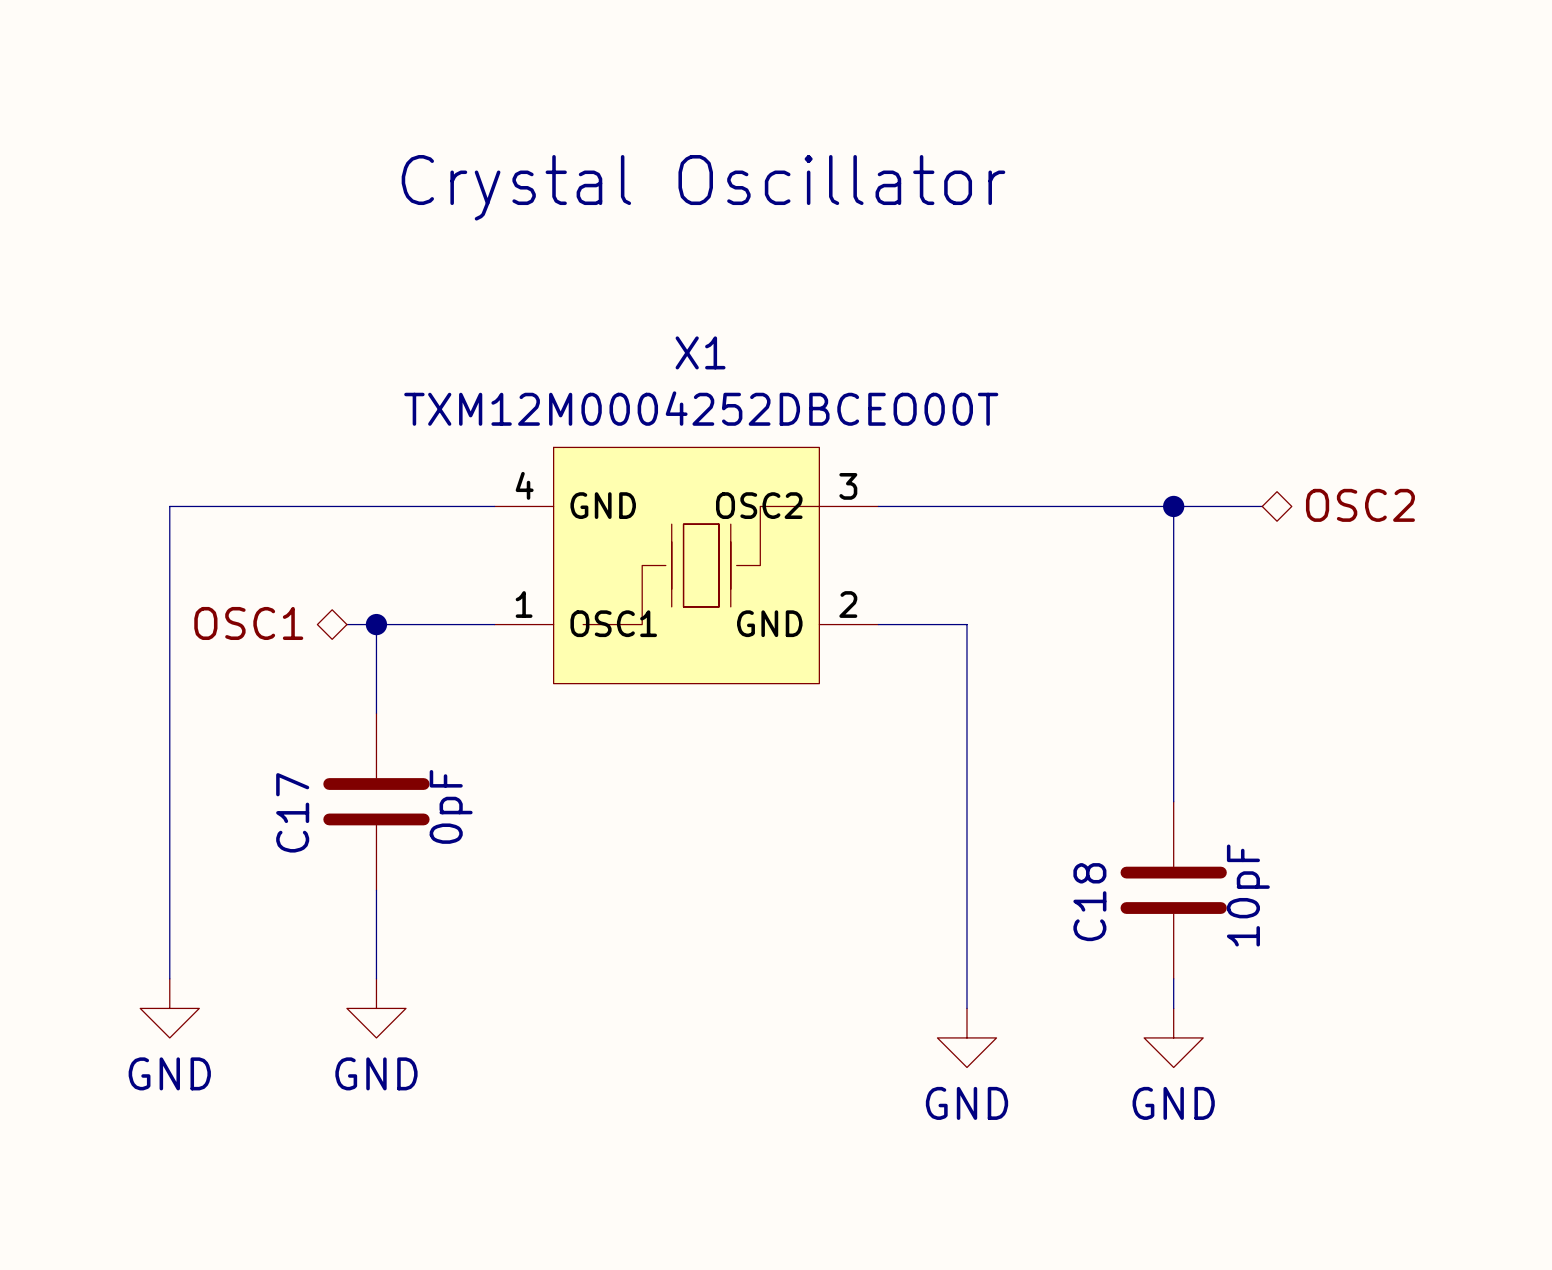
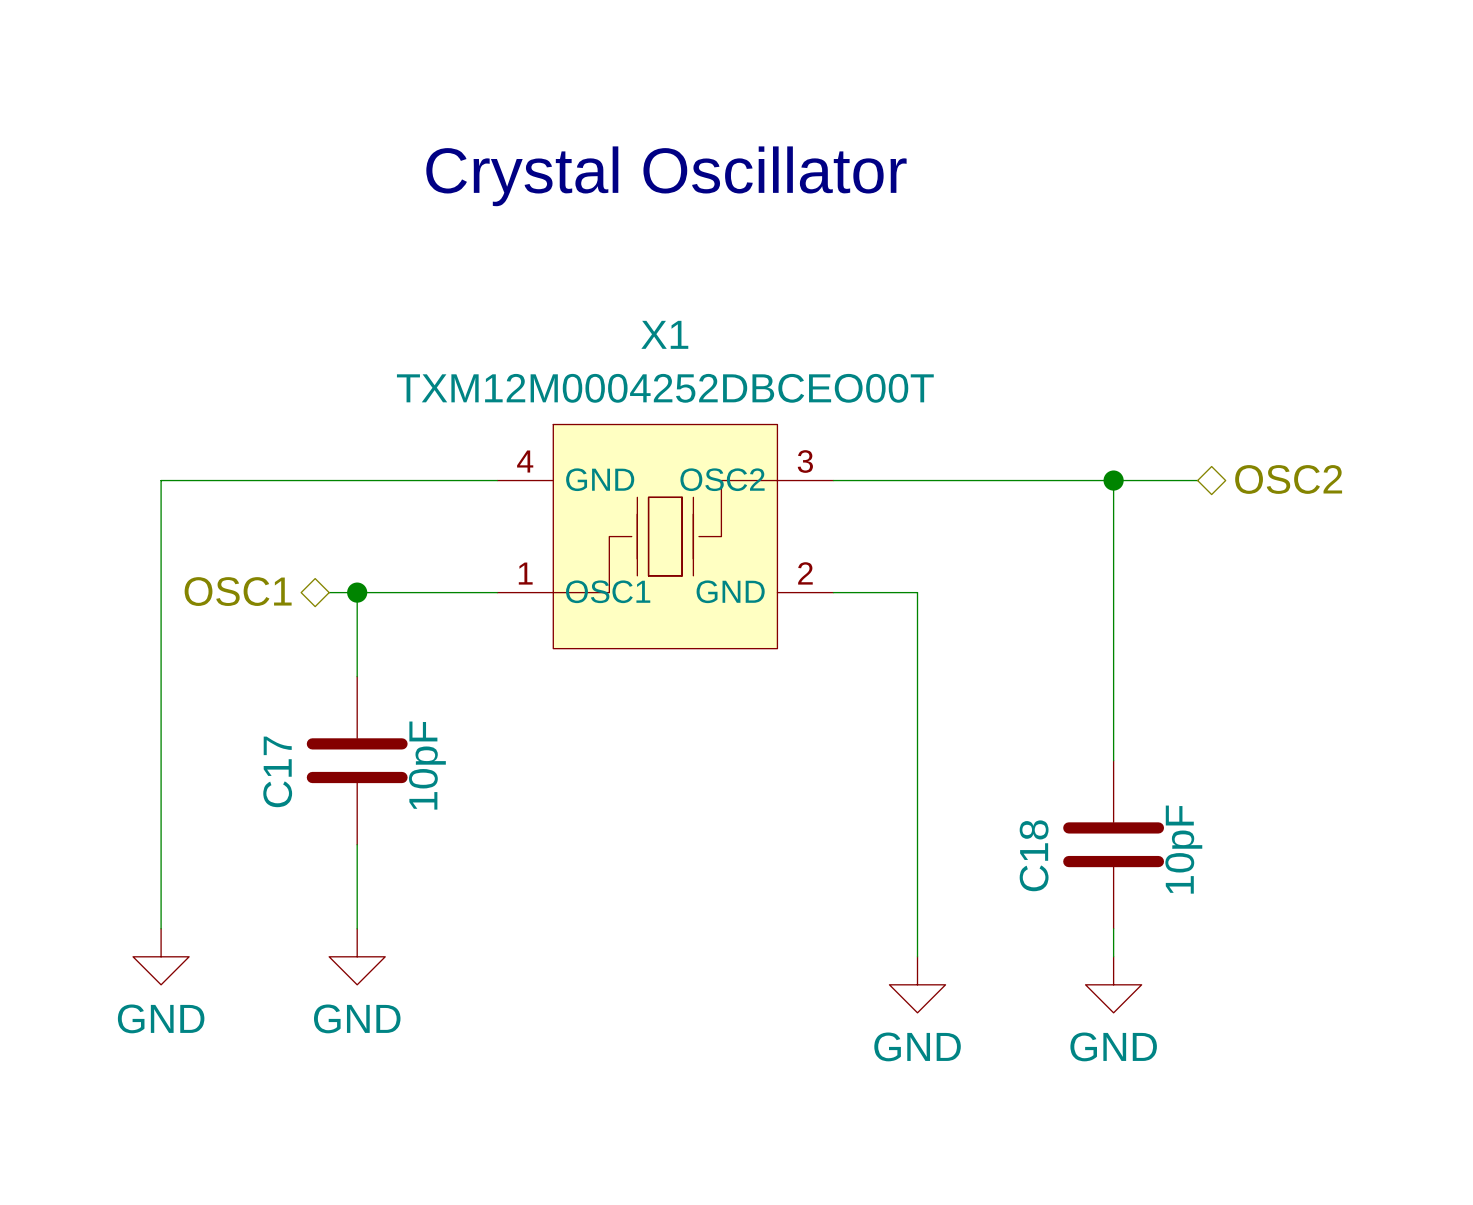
X1 symbol: [494, 447, 879, 684] -> [497, 424, 834, 649]
C17 value: 0pF (451, 806) -> 10pF (427, 765)

